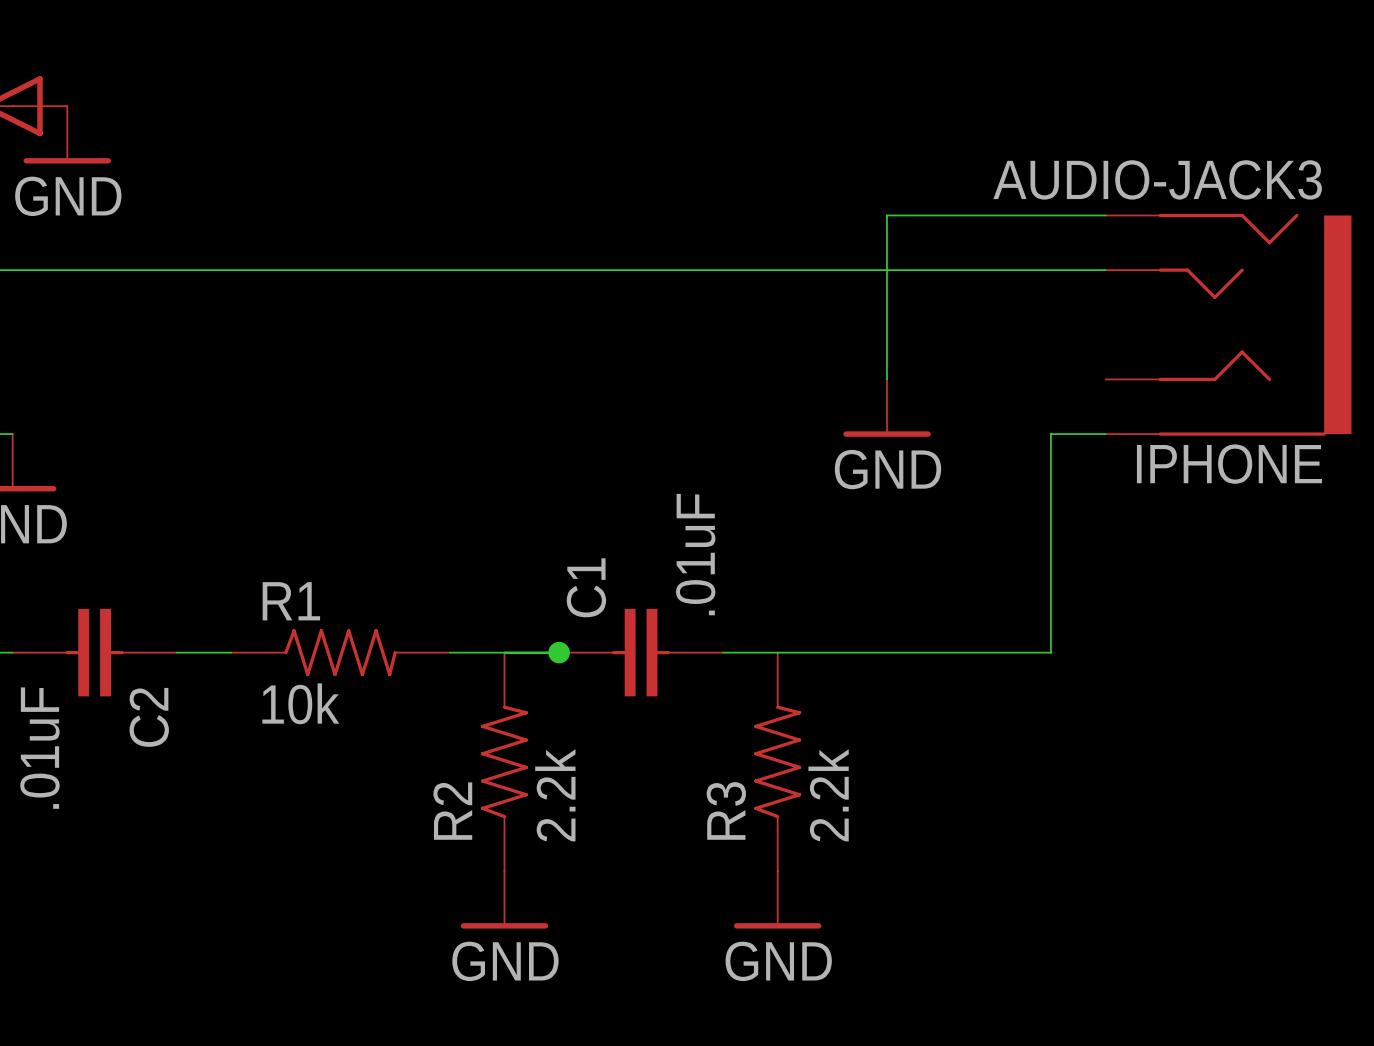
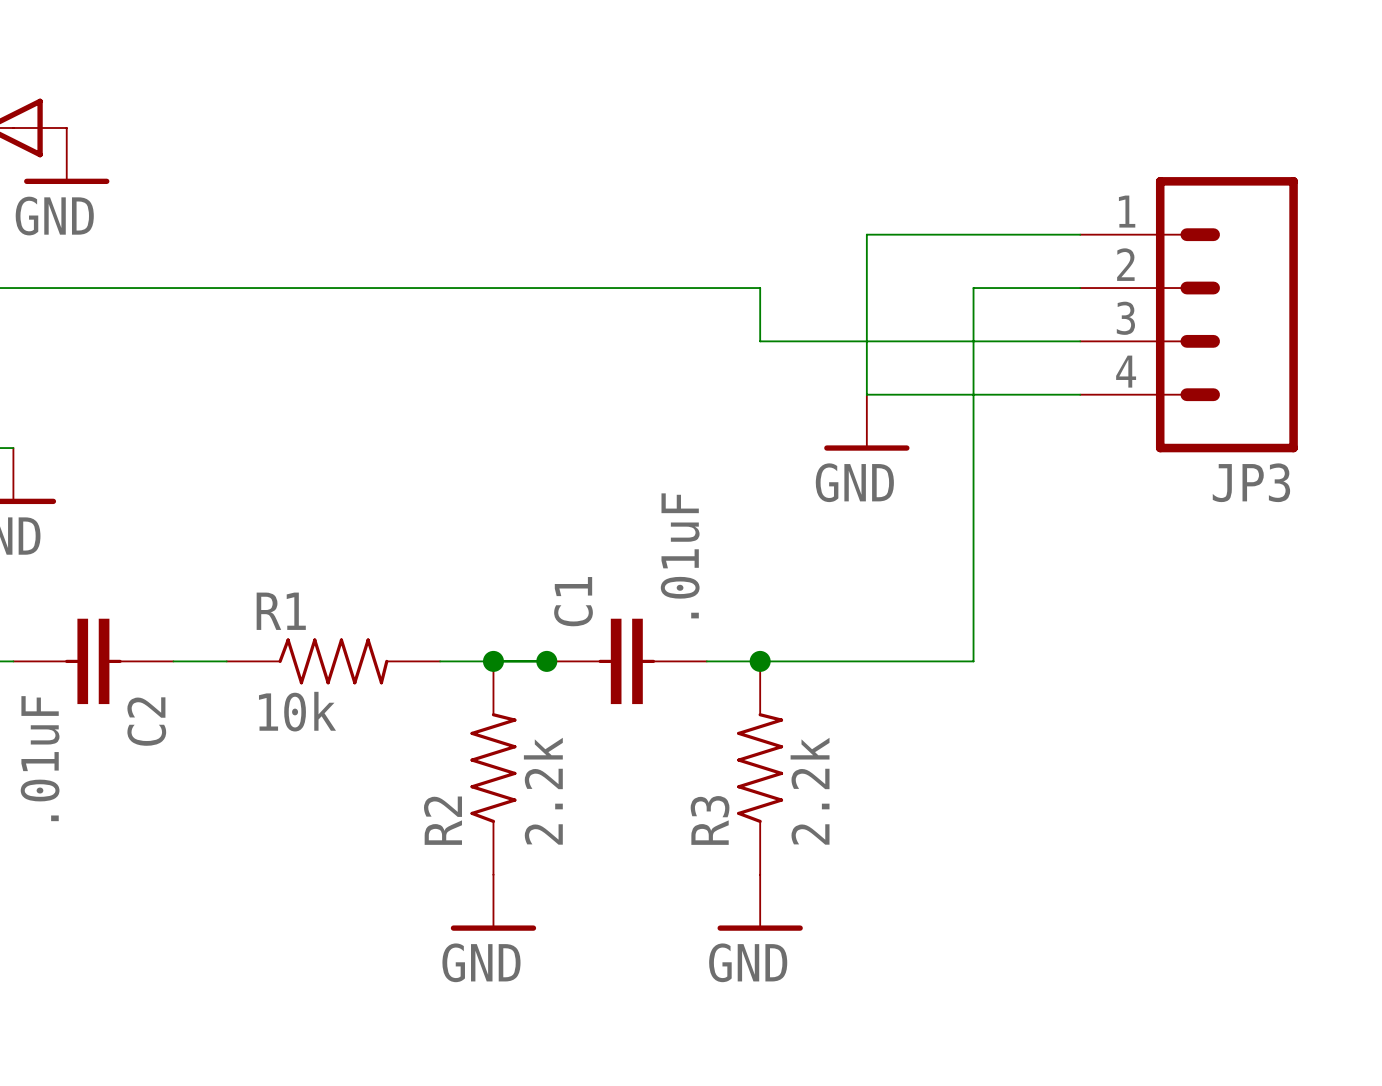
wire: (777, 270) (996, 270) -> (760, 288) (760, 341) (1080, 341)
JP3: none -> (1189, 314)
IPHONE: AUDIO-JACK3 (1228, 324) -> none
wire: none -> (866, 394) (1080, 394)
wire: (1105, 434) (1050, 434) (1050, 652) (996, 652) -> (973, 288) (973, 661)
junction: none -> (493, 661)
junction: none -> (760, 661)

